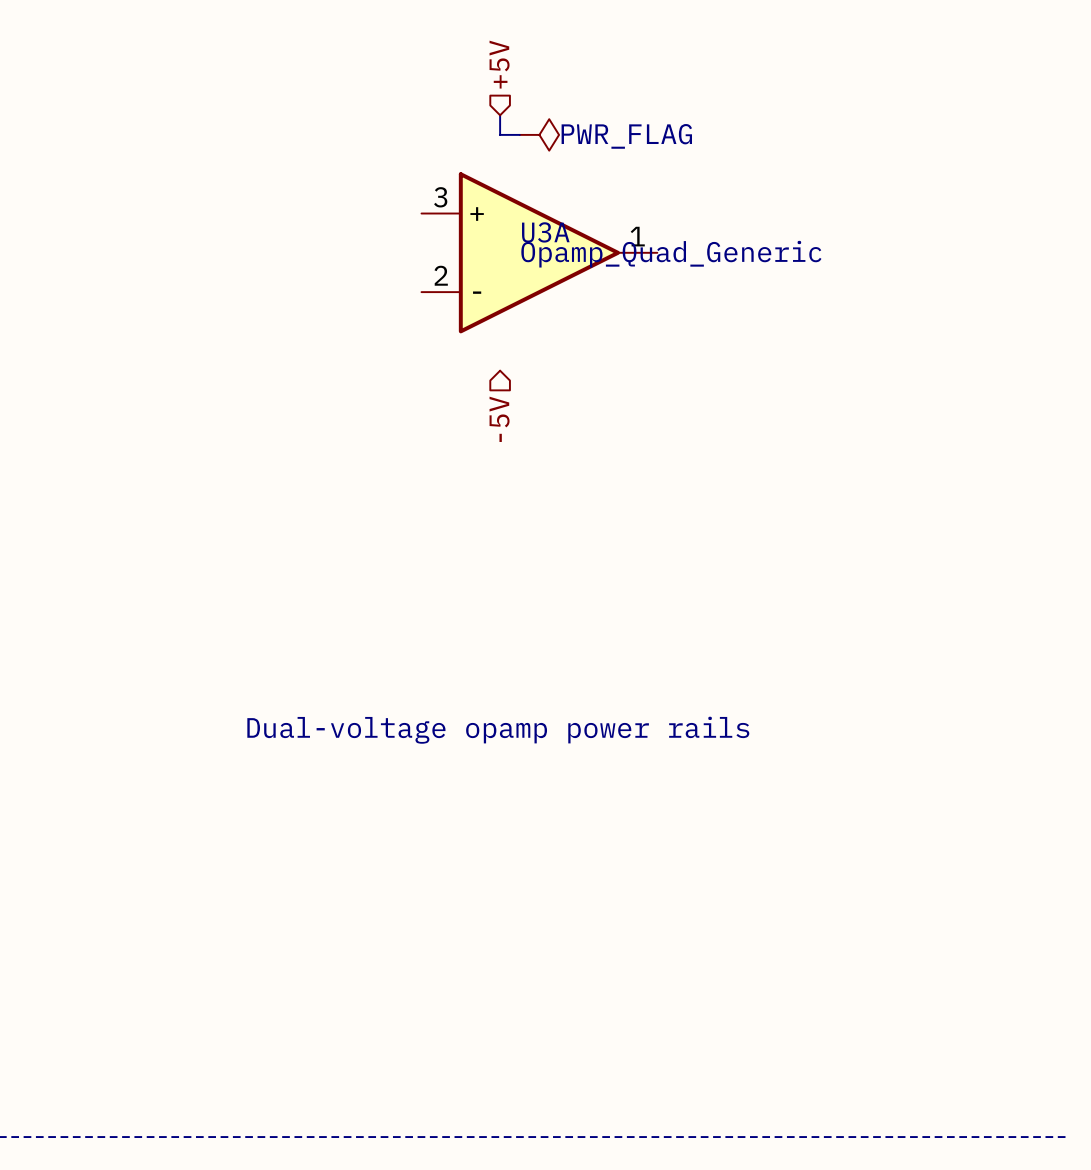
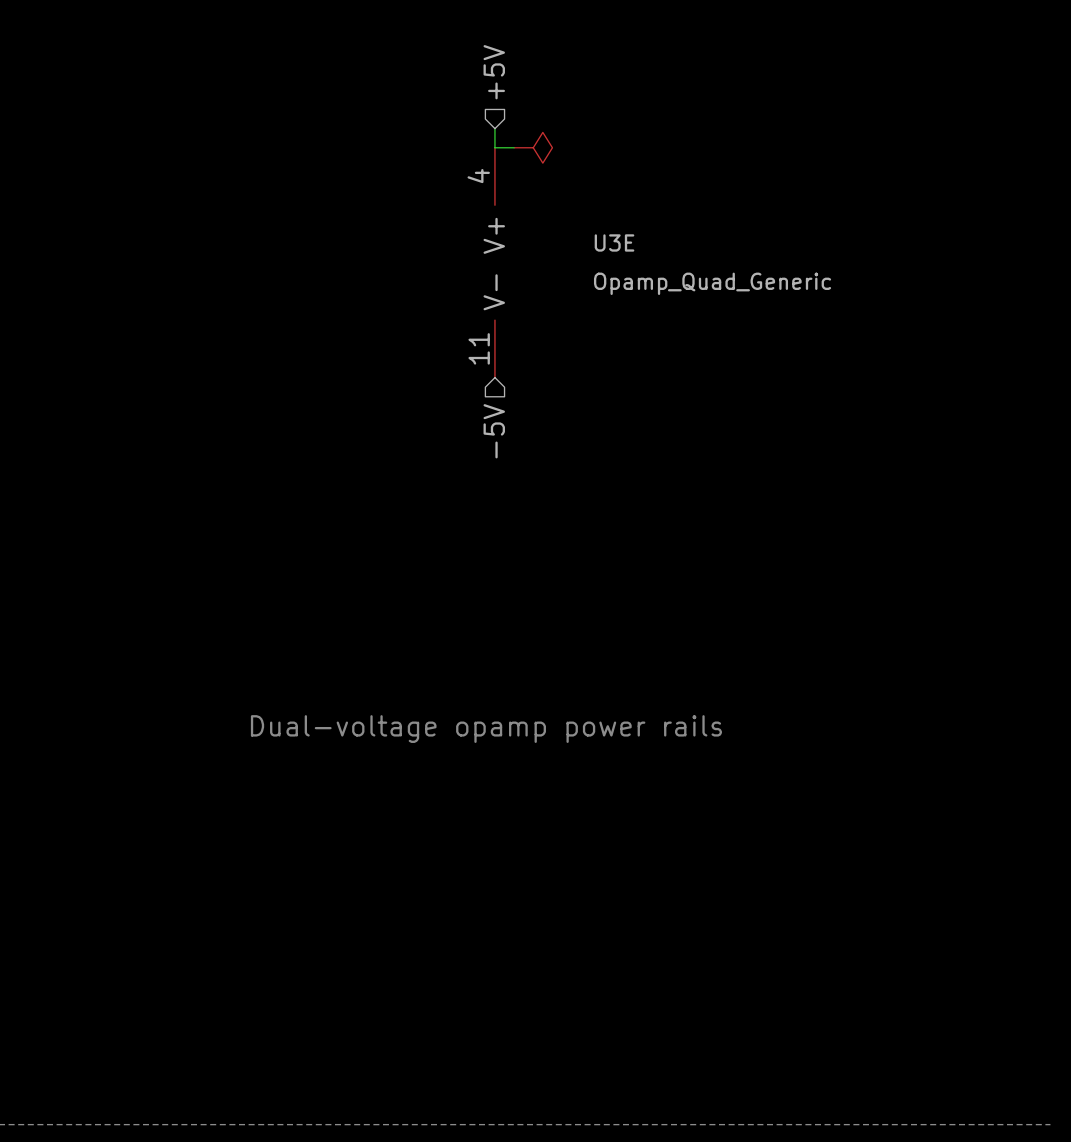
power symbol text: PWR_FLAG (626, 136) -> none
U3E: none -> Opamp_Quad_Generic (494, 262)
U3A: Opamp_Quad_Generic (539, 252) -> none

